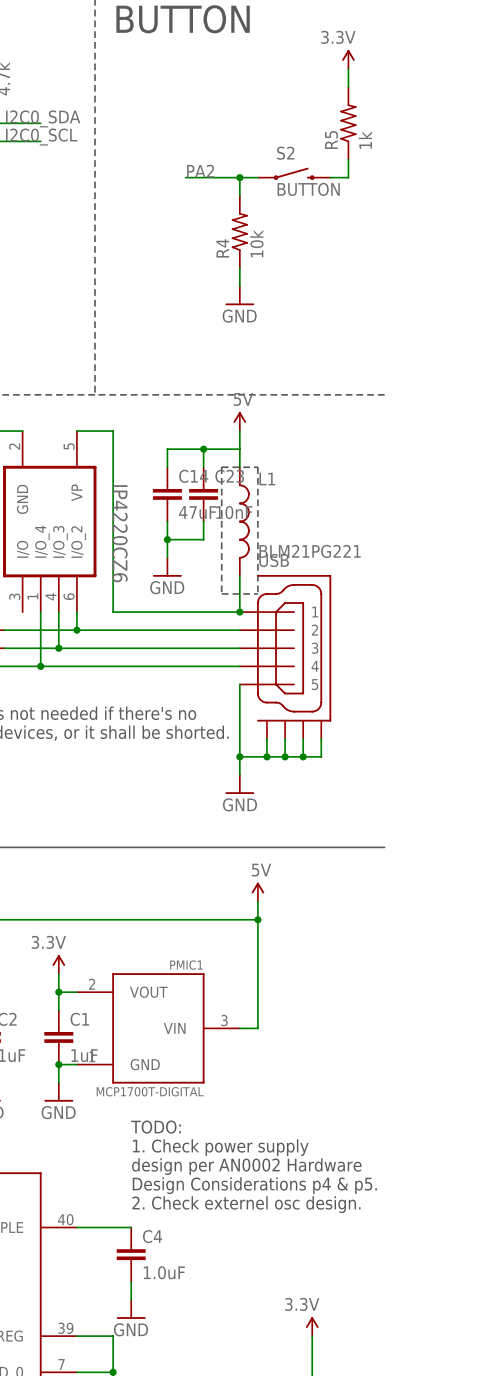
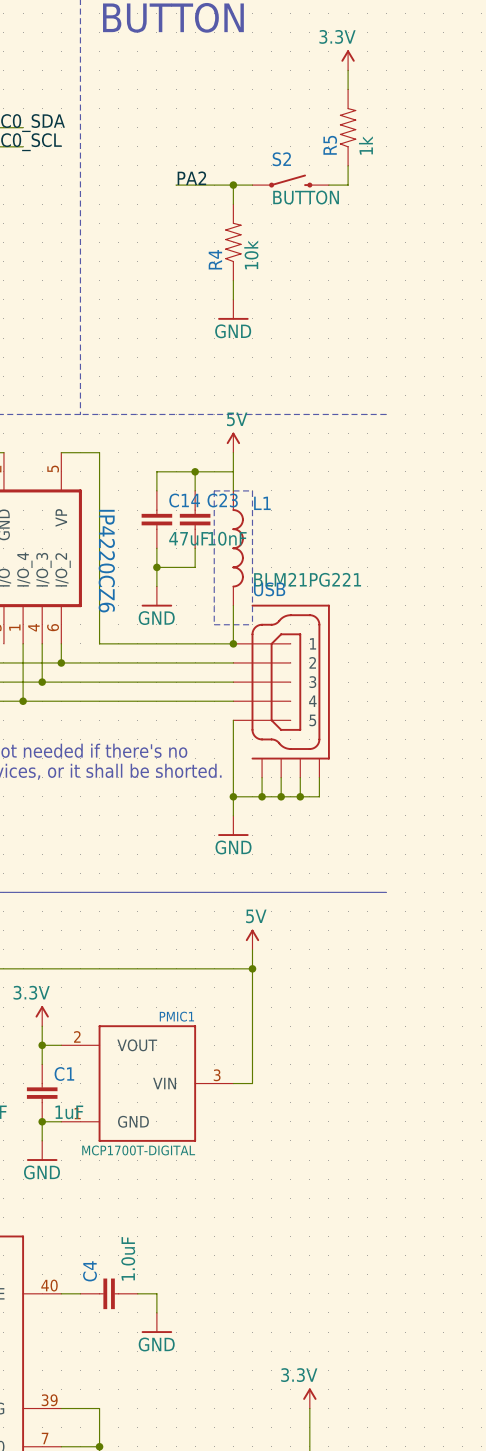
text: TODO: (156, 1127) -> none
text: 1. Check power supply (220, 1147) -> none
text: design per AN0002 Hardware (246, 1166) -> none
text: Design Considerations p4 & p5. (254, 1185) -> none
text: 2. Check externel osc design. (246, 1204) -> none
wire: none -> (137, 1293) (156, 1293) (156, 1312)
C4 name position: C4 (152, 1236) -> C4 (90, 1271)
C4 rotation: 0° (131, 1254) -> 90° clockwise (109, 1293)
C4 value position: 1.0uF (164, 1272) -> 1.0uF (128, 1258)
wire: (131, 1281) (131, 1299) -> none
power symbol position: GND (131, 1309) -> GND (156, 1322)

